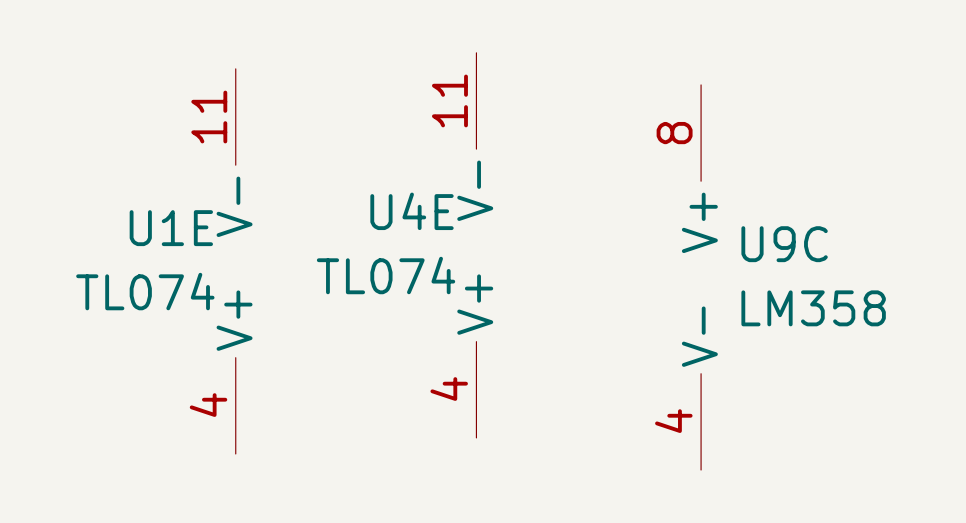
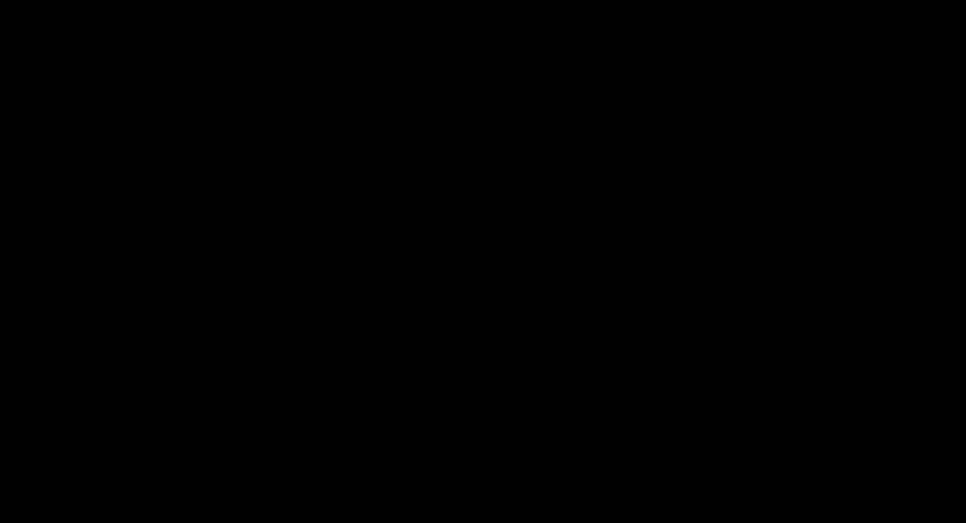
U4E: TL074 (476, 245) -> none
U1E: TL074 (235, 261) -> none
U9C: LM358 (701, 277) -> none

